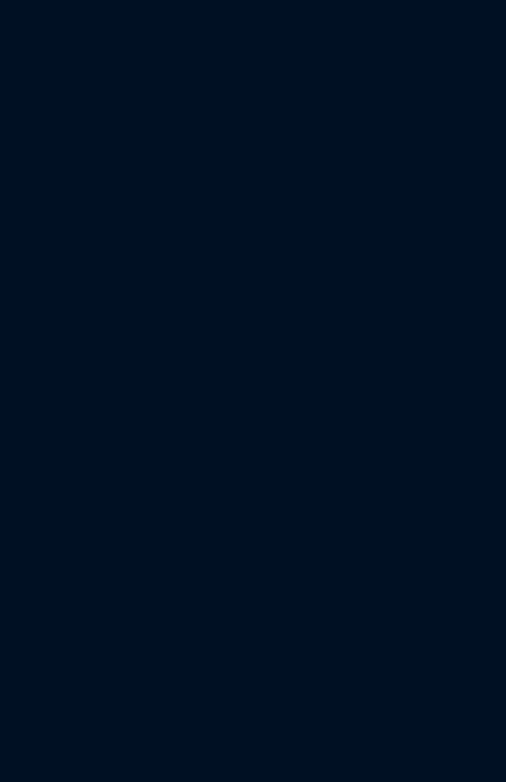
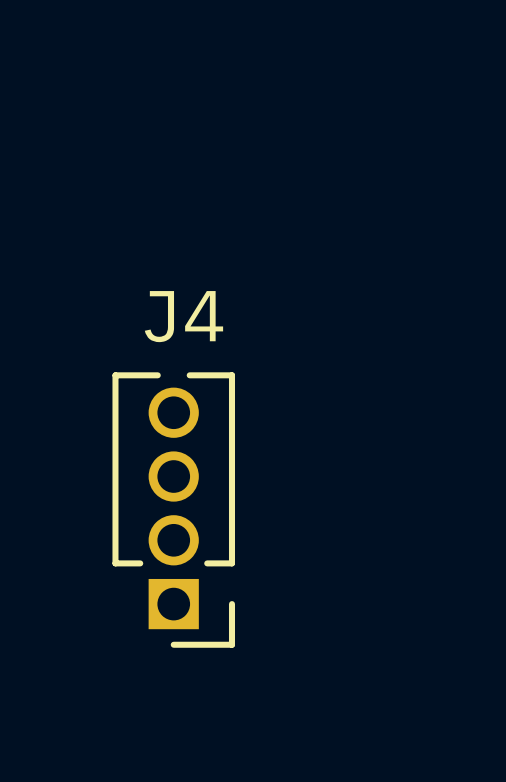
J4: none -> (173, 510)

